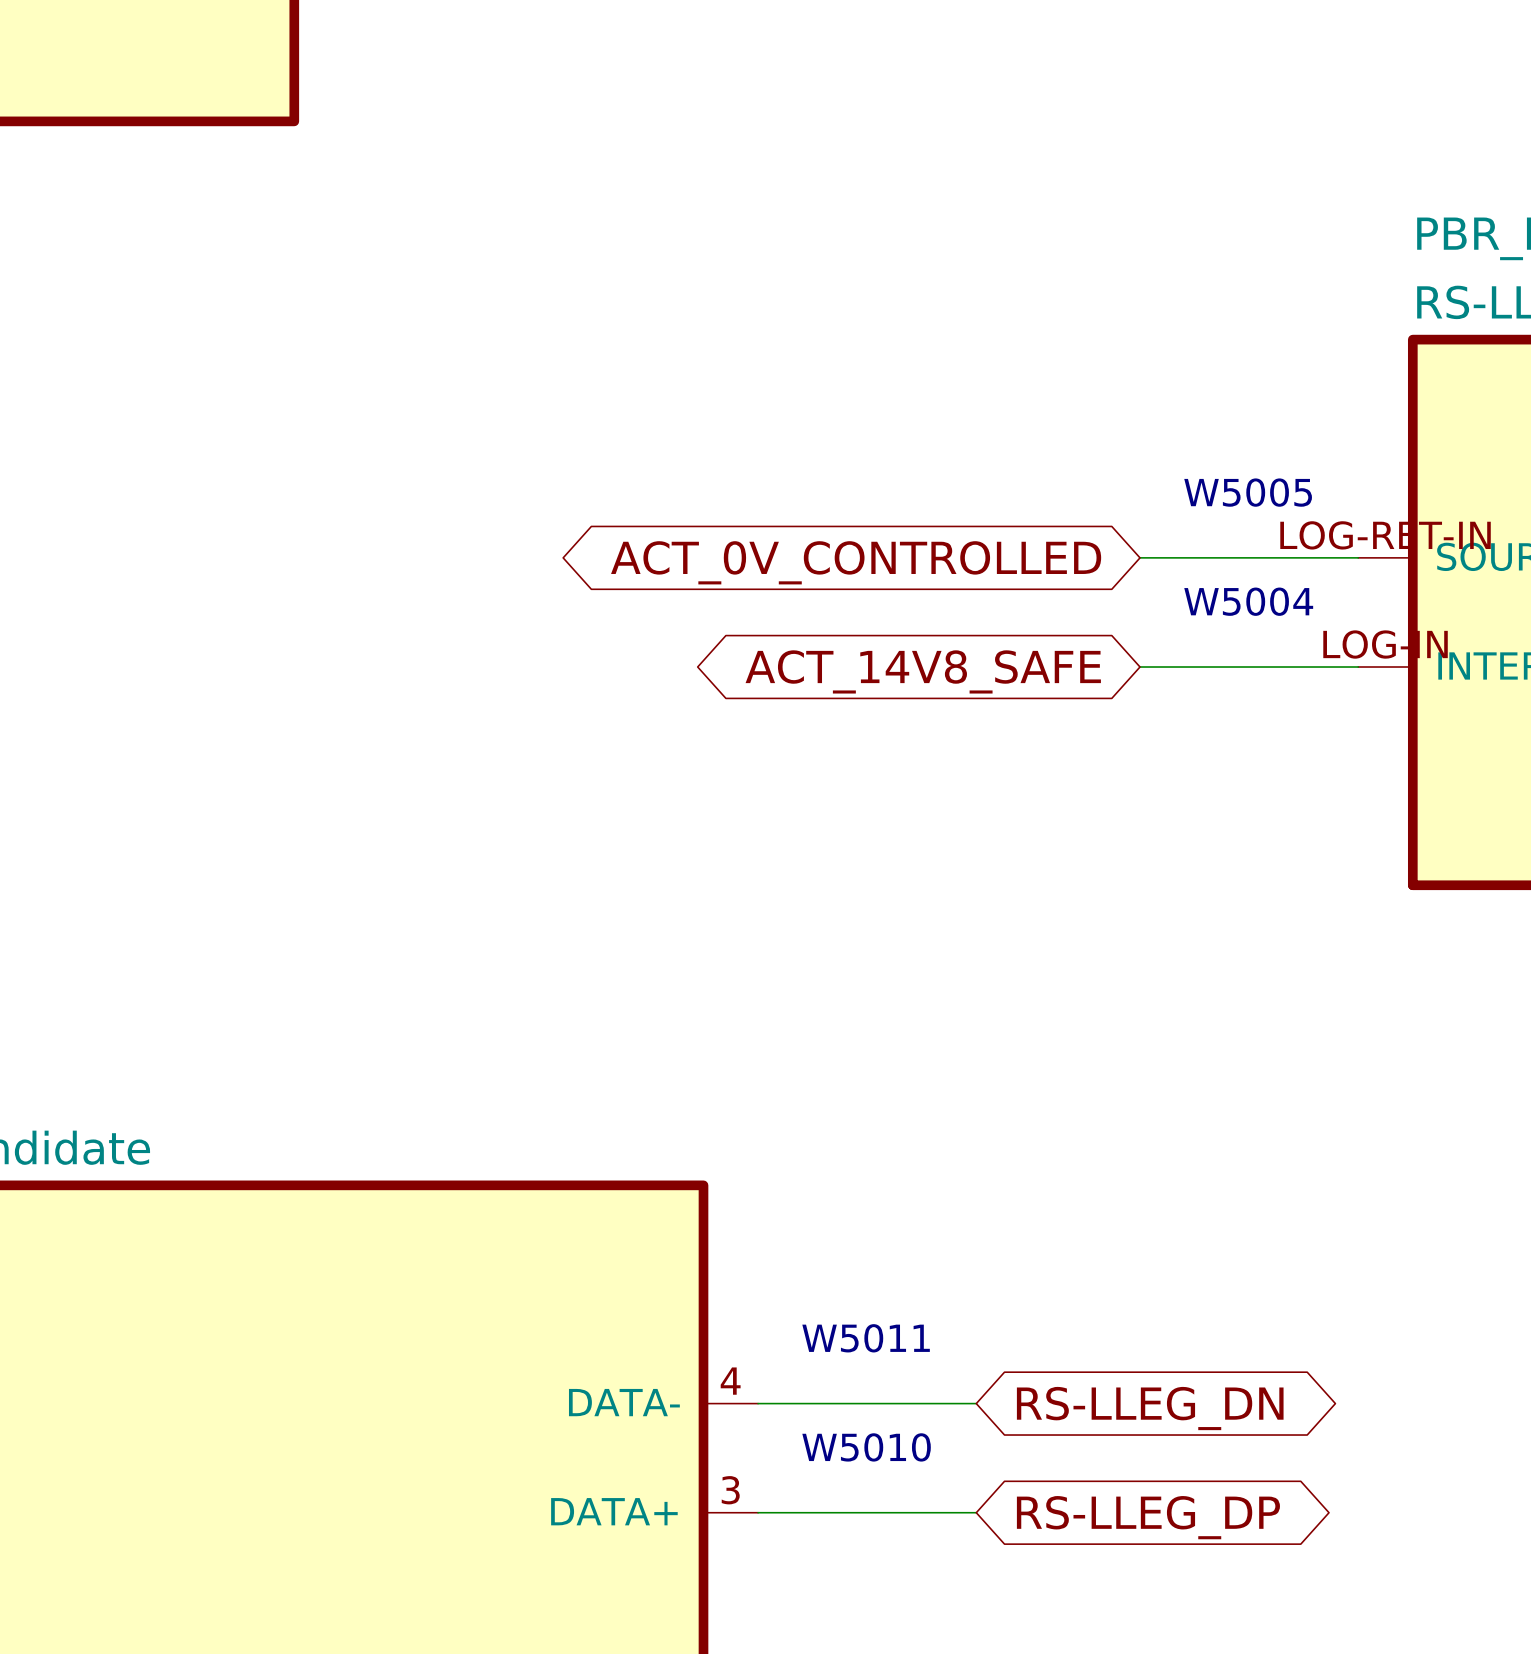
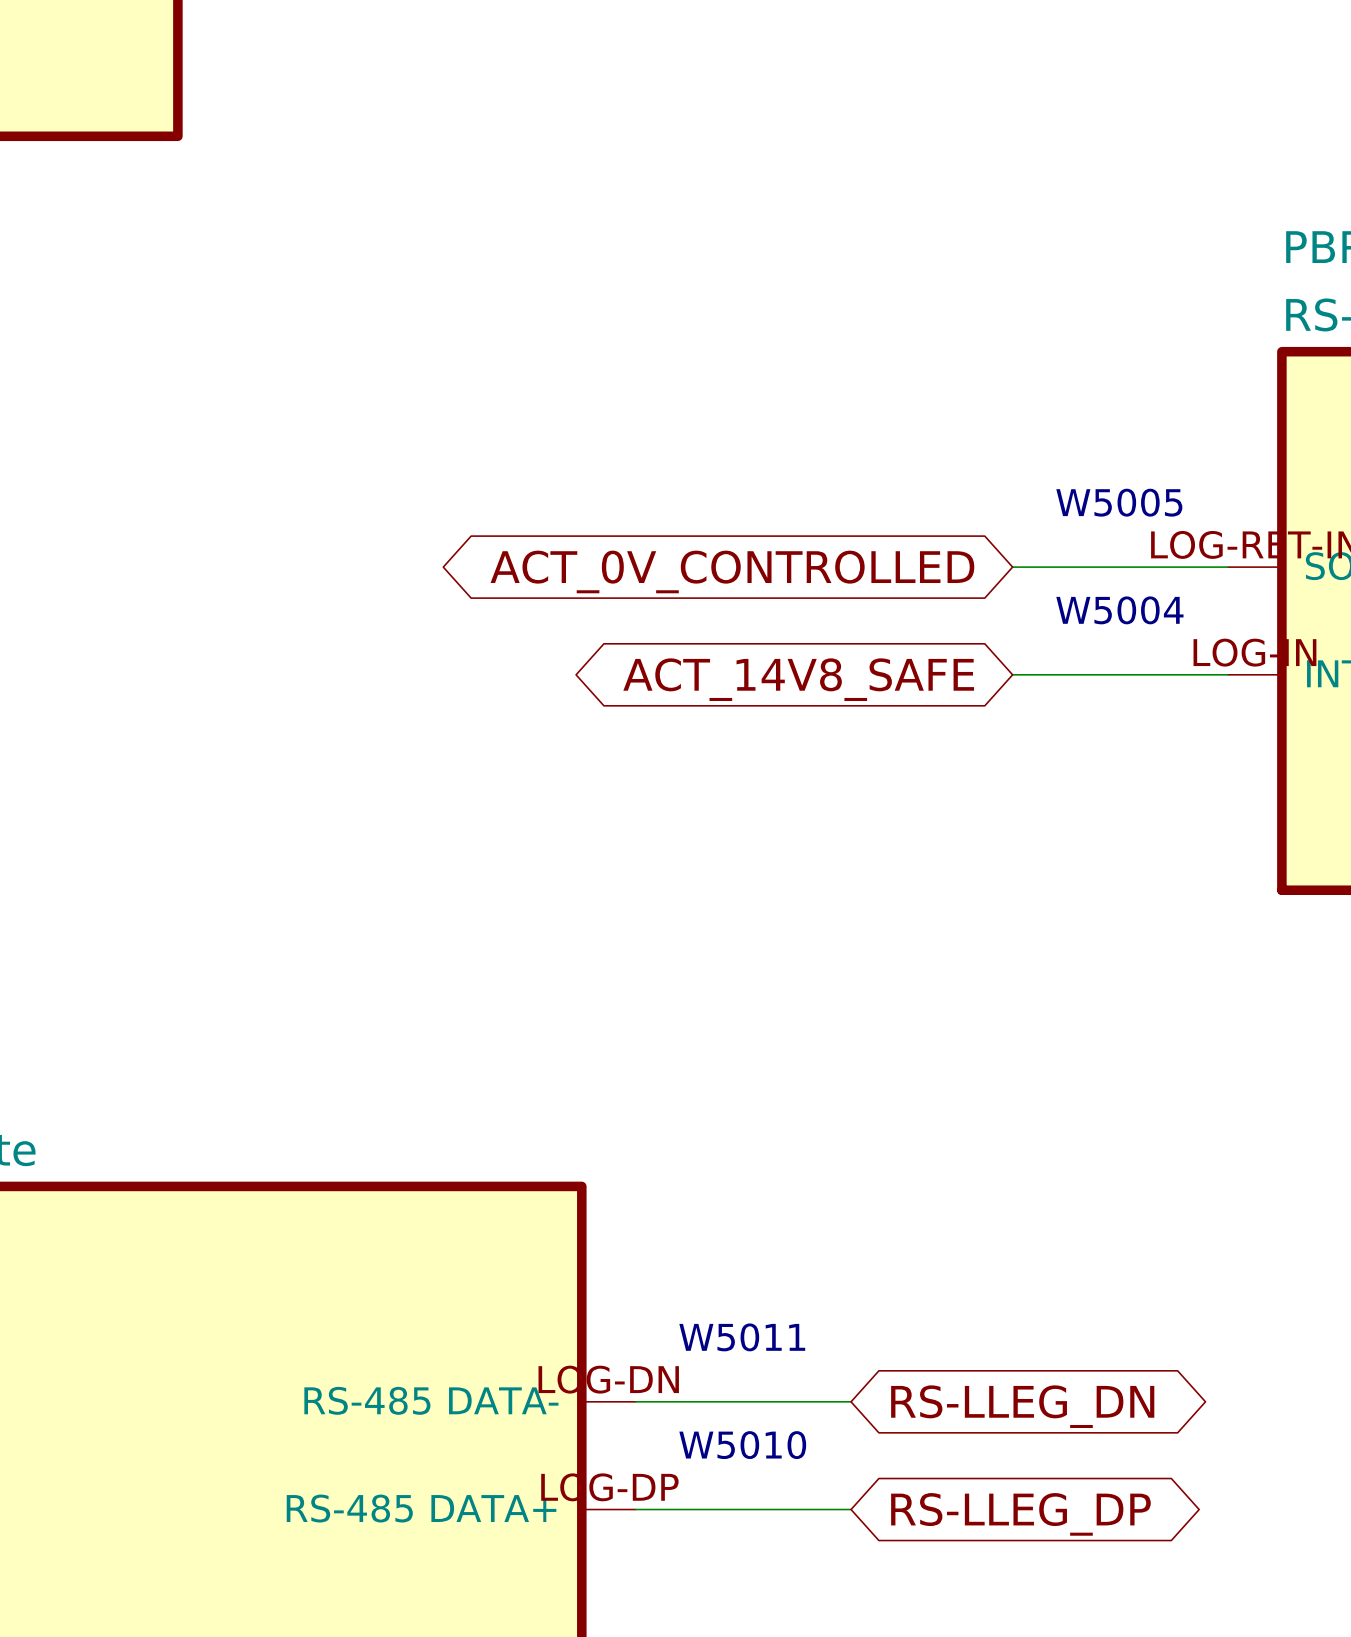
part pin number: 4 (730, 1381) -> LOG-DN (608, 1379)
part pin name: DATA- (624, 1402) -> RS-485 DATA- (431, 1400)
part pin number: 3 (730, 1490) -> LOG-DP (609, 1487)
part pin name: DATA+ (614, 1511) -> RS-485 DATA+ (421, 1508)

